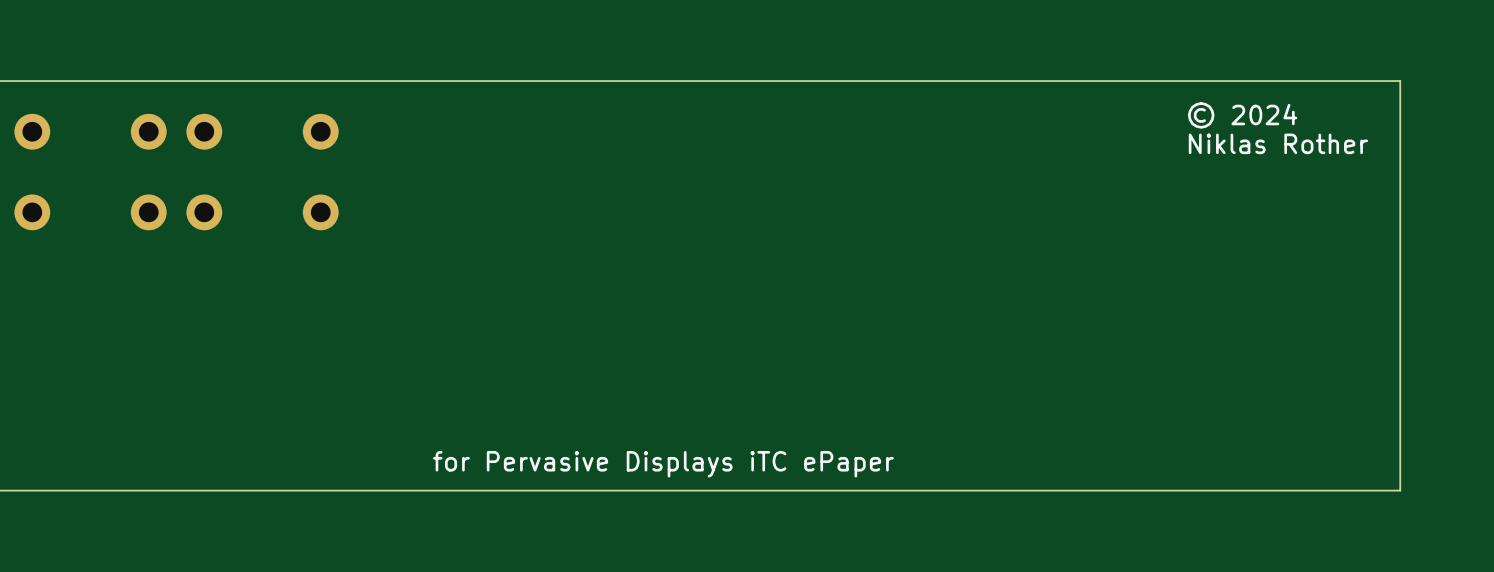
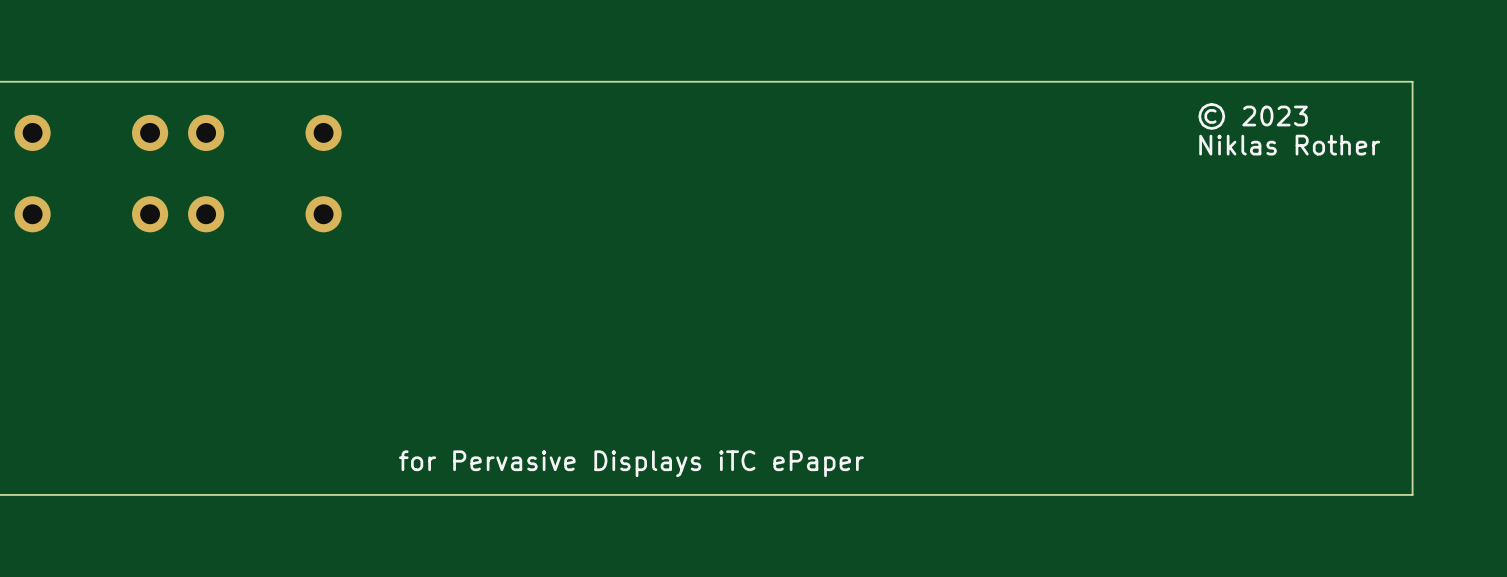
text: © 2024 (1242, 115) -> © 2023 (1253, 116)
text position: for Pervasive Displays iTC ePaper (663, 464) -> for Pervasive Displays iTC ePaper (631, 463)

